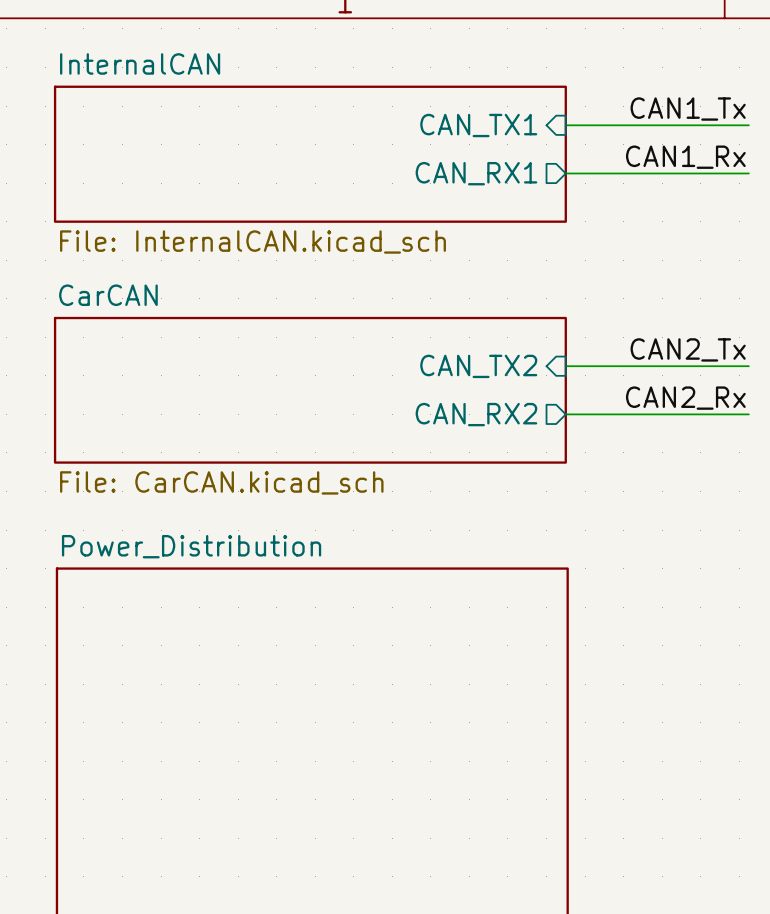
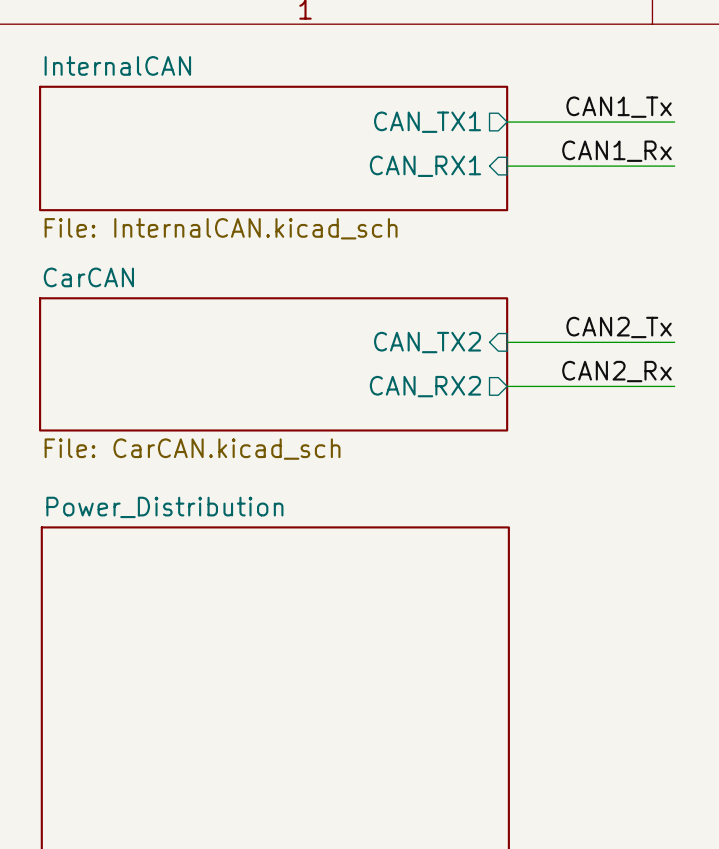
sheet pin shape: input (478, 125) -> output (427, 122)
sheet pin shape: output (476, 173) -> input (425, 166)

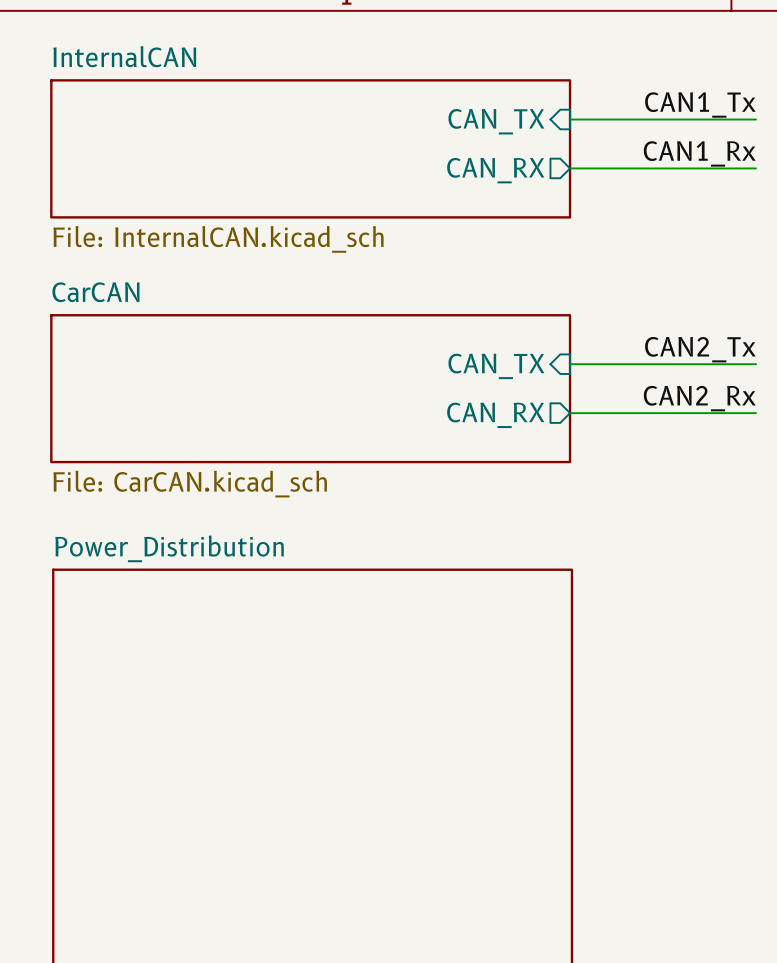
sheet pin shape: output (427, 122) -> input (496, 121)
sheet pin: CAN_TX1 (427, 122) -> CAN_TX (496, 121)
sheet pin shape: input (425, 166) -> output (495, 170)
sheet pin: CAN_RX1 (425, 166) -> CAN_RX (495, 170)
sheet pin: CAN_TX2 (427, 342) -> CAN_TX (496, 366)
sheet pin: CAN_RX2 (425, 386) -> CAN_RX (495, 415)

